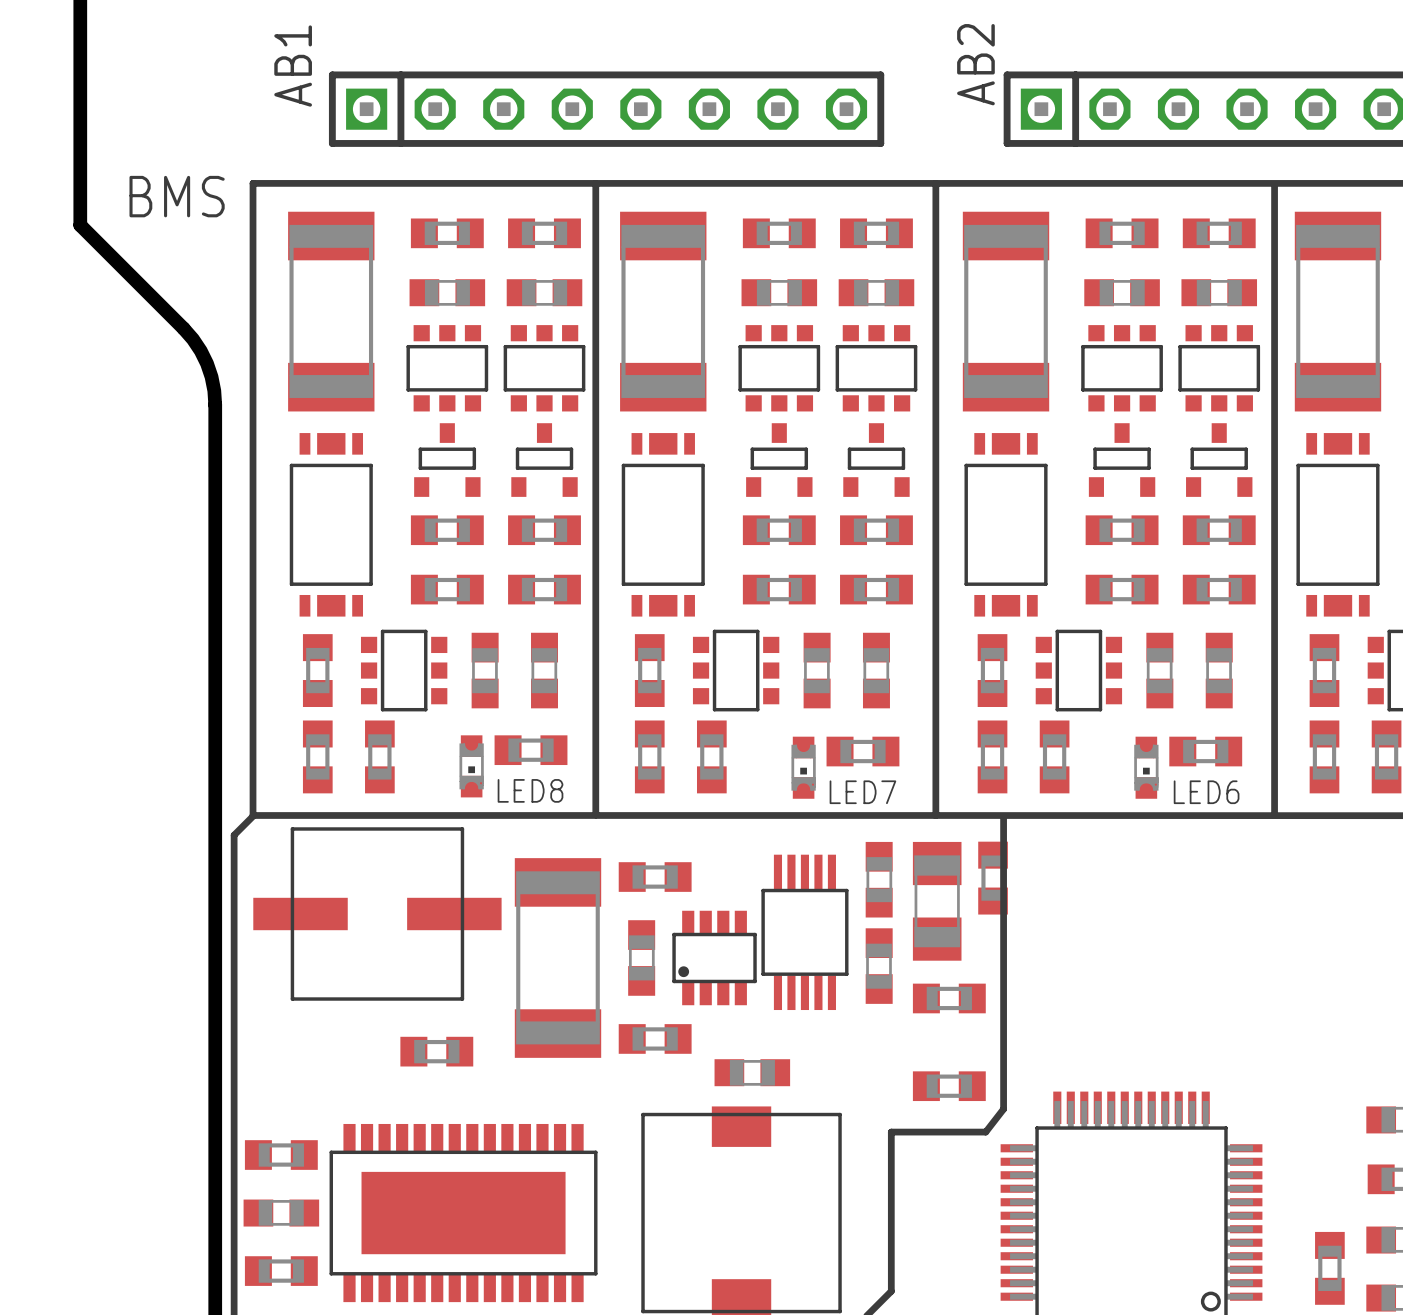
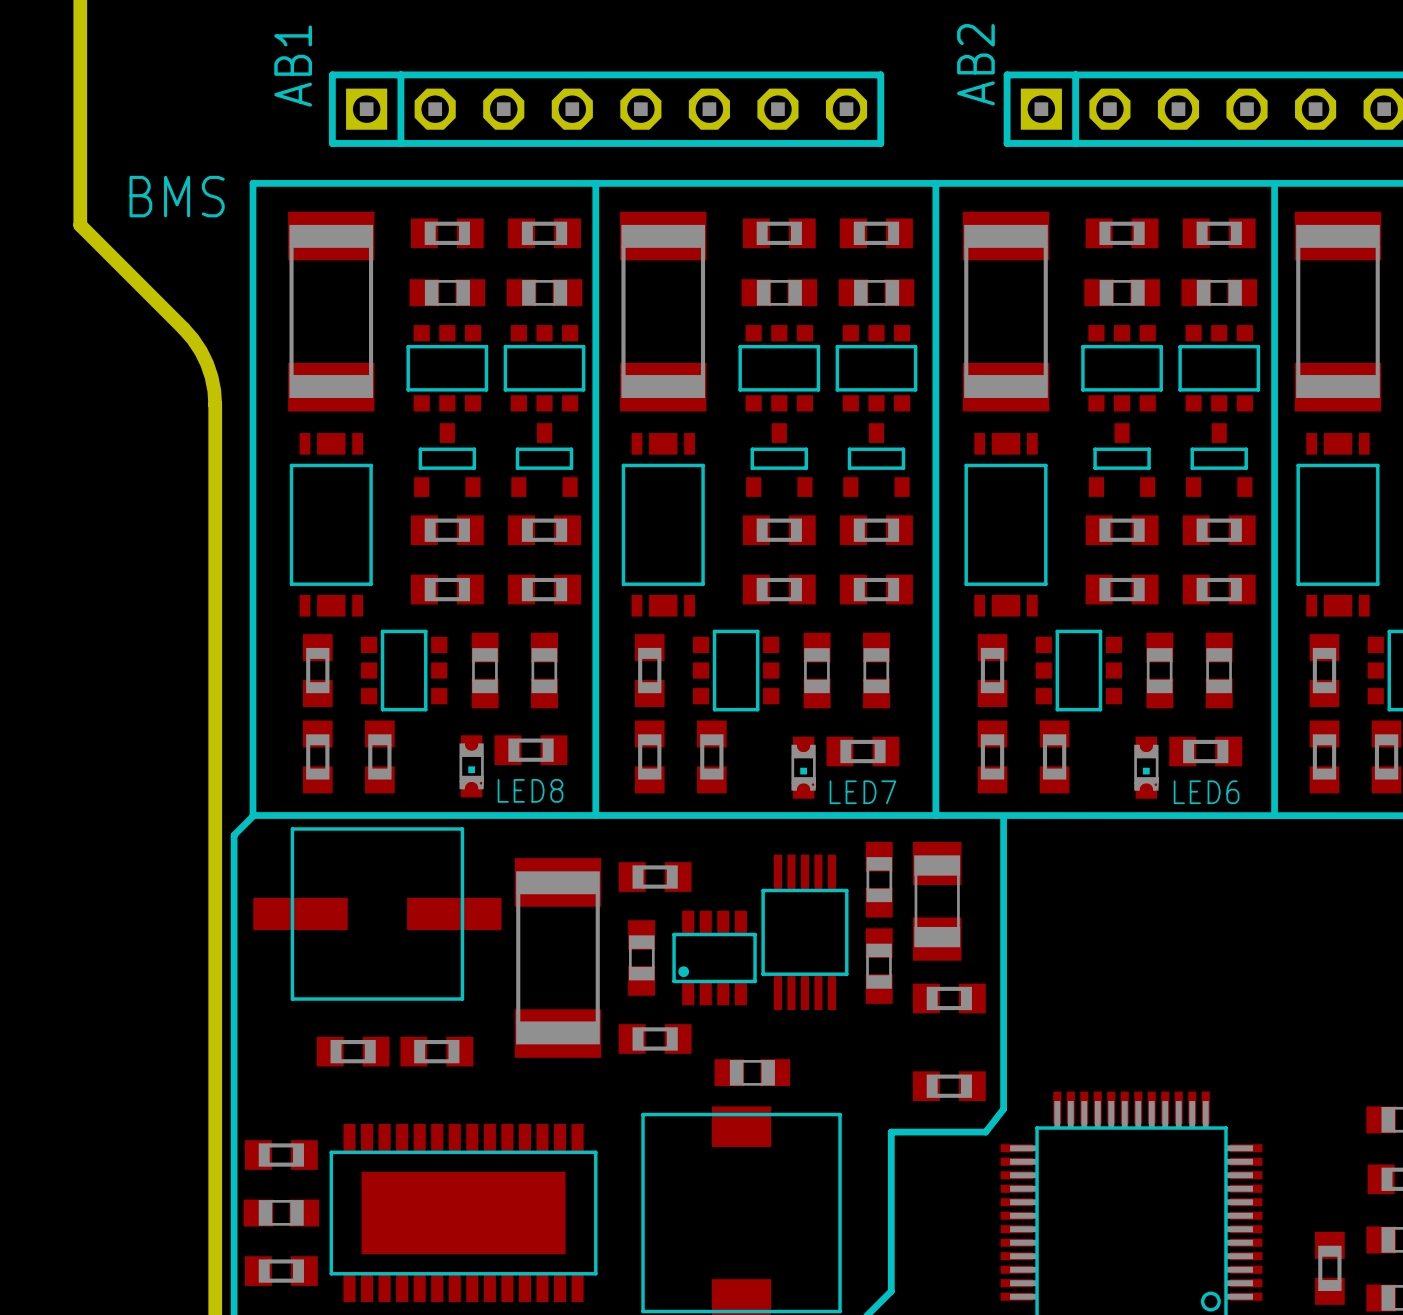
part rotation: 0° (993, 878) -> 90° clockwise (353, 1051)
part position: (993, 878) -> (353, 1051)

